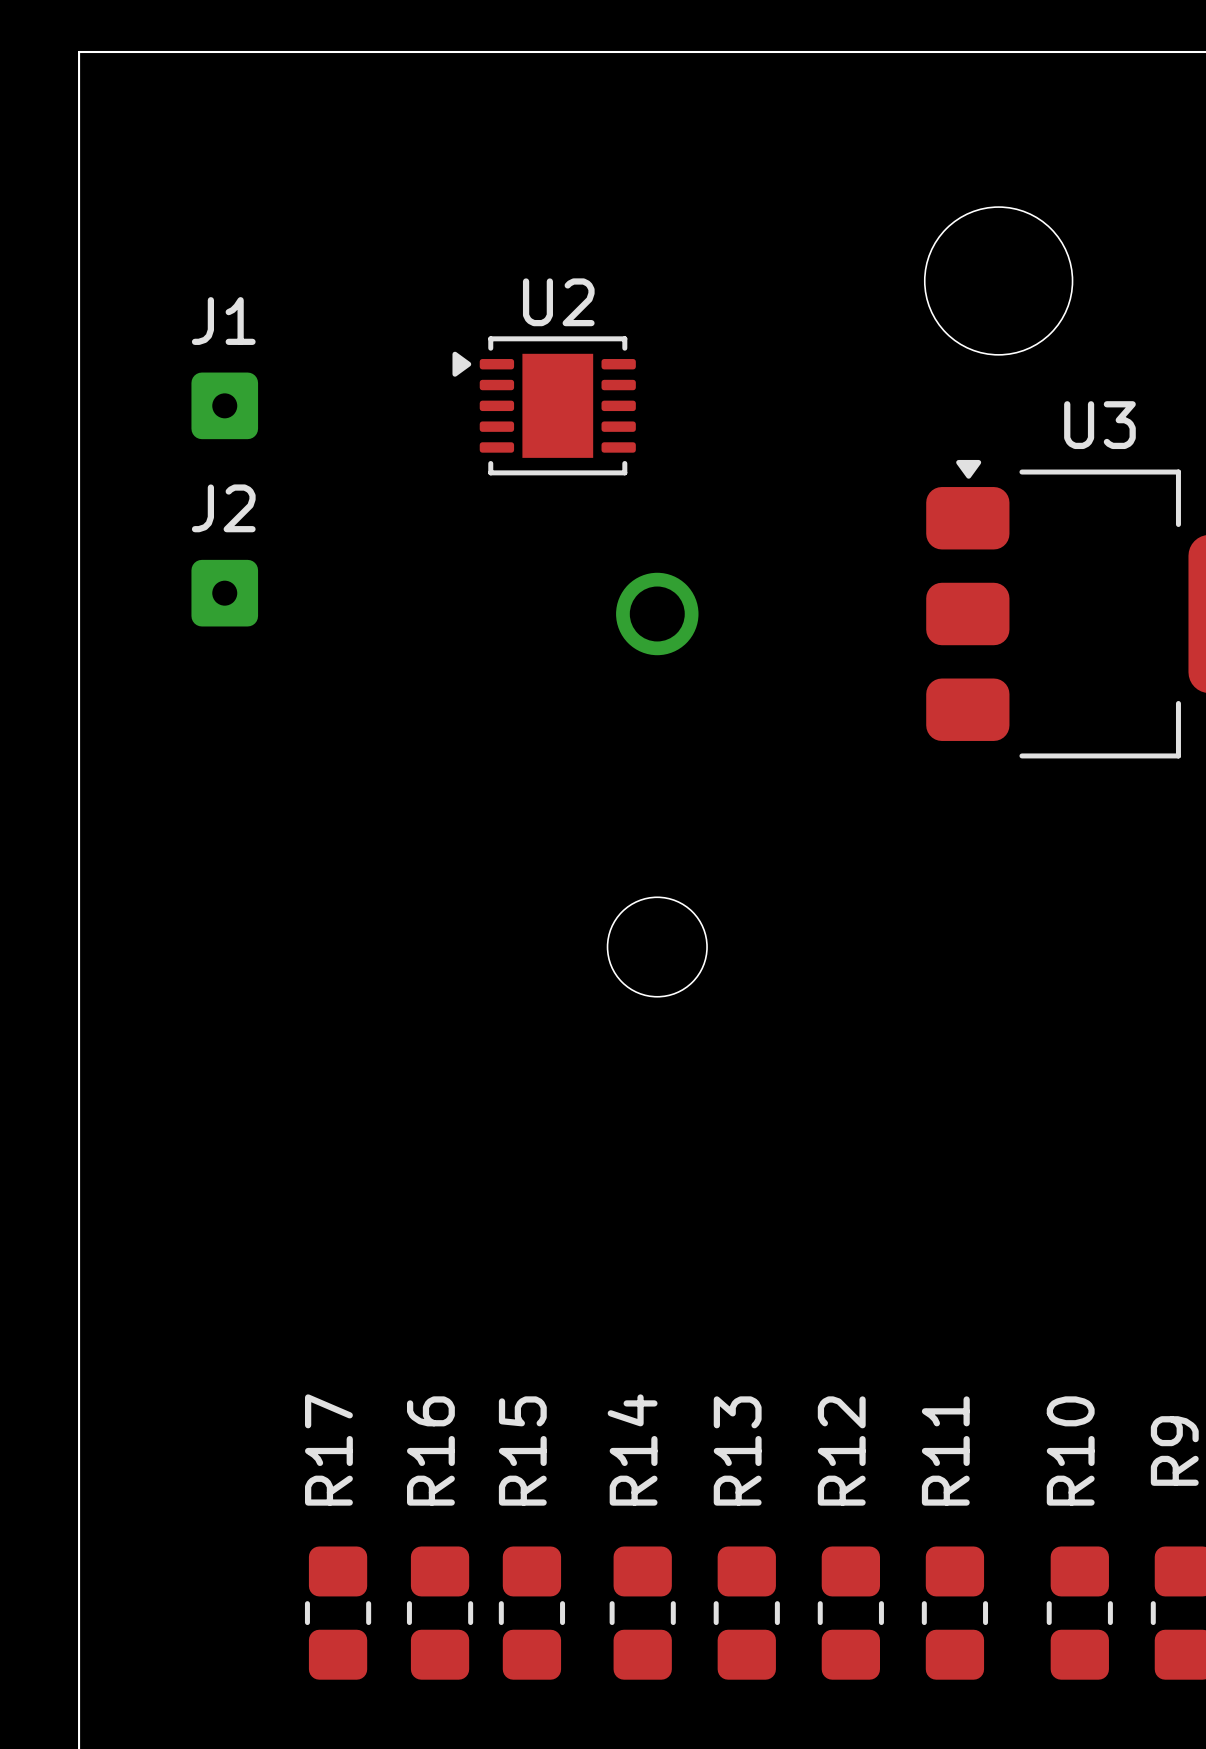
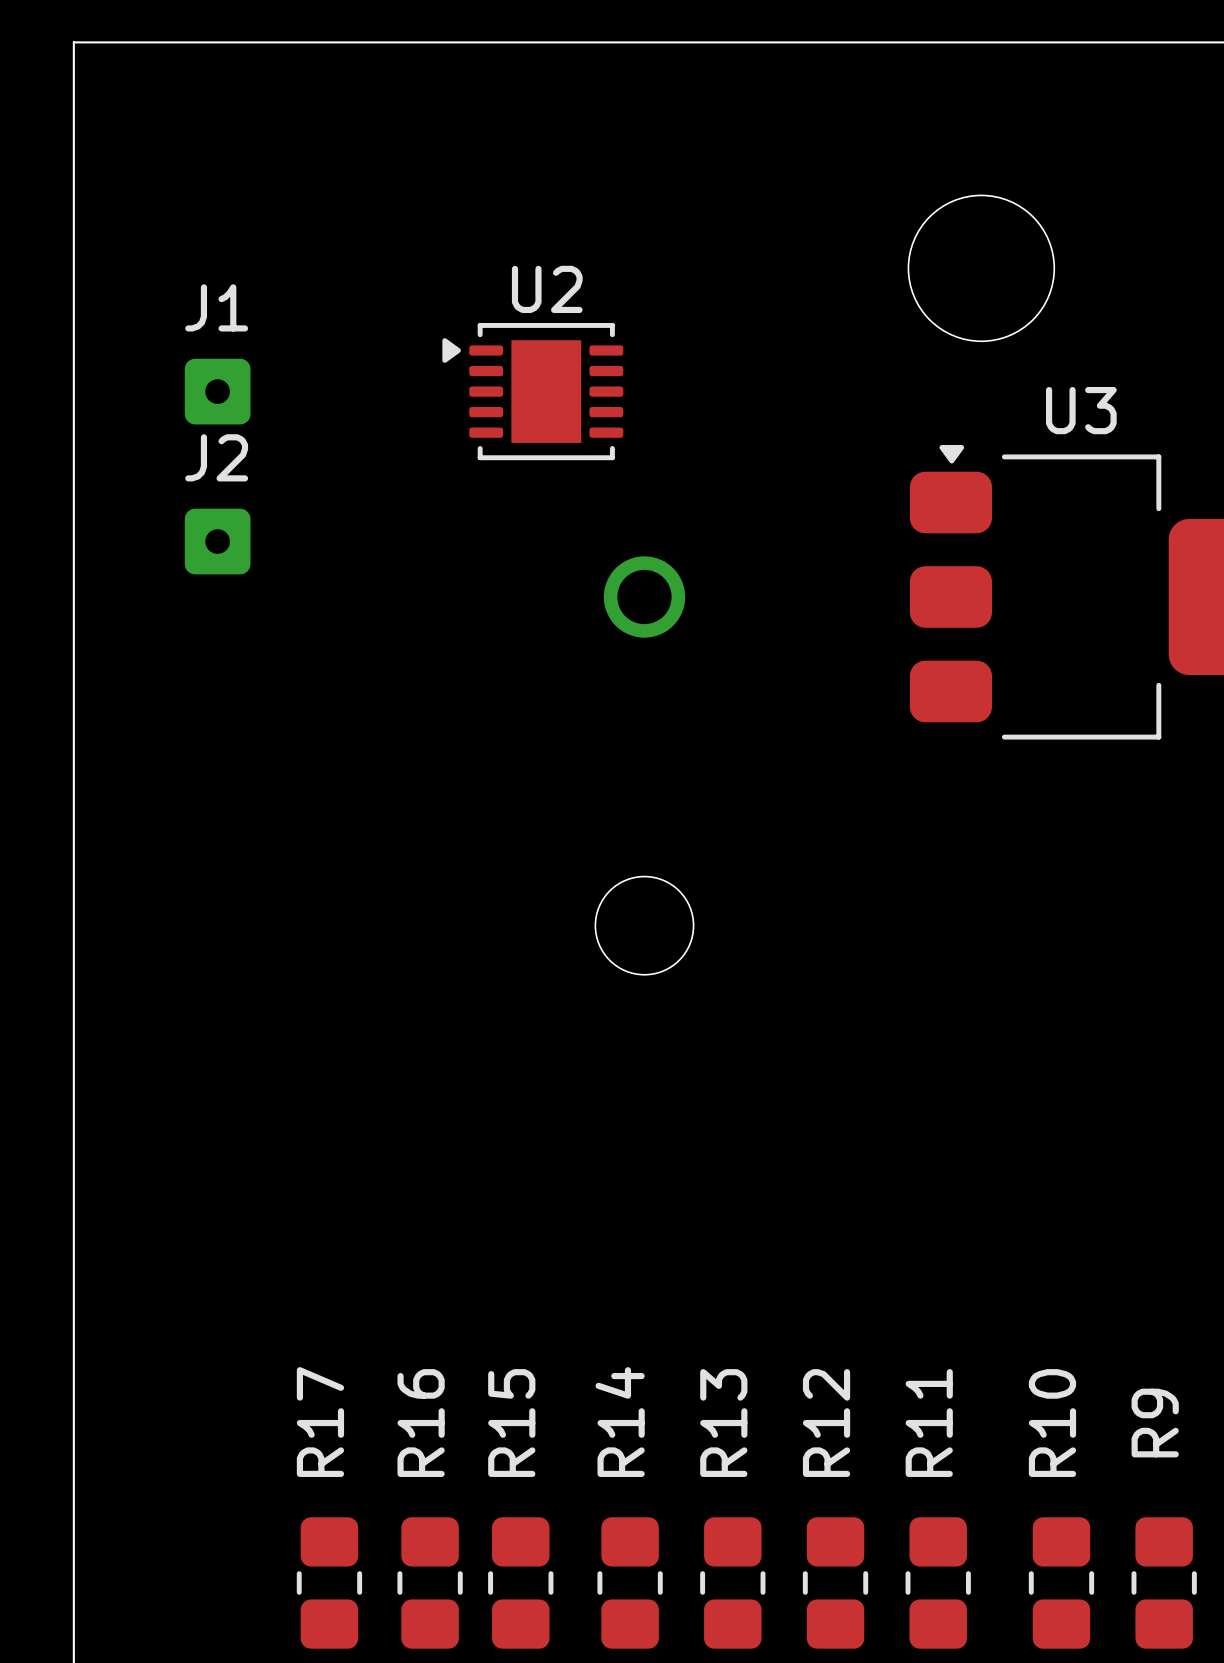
J2 position: (224, 593) -> (217, 541)

